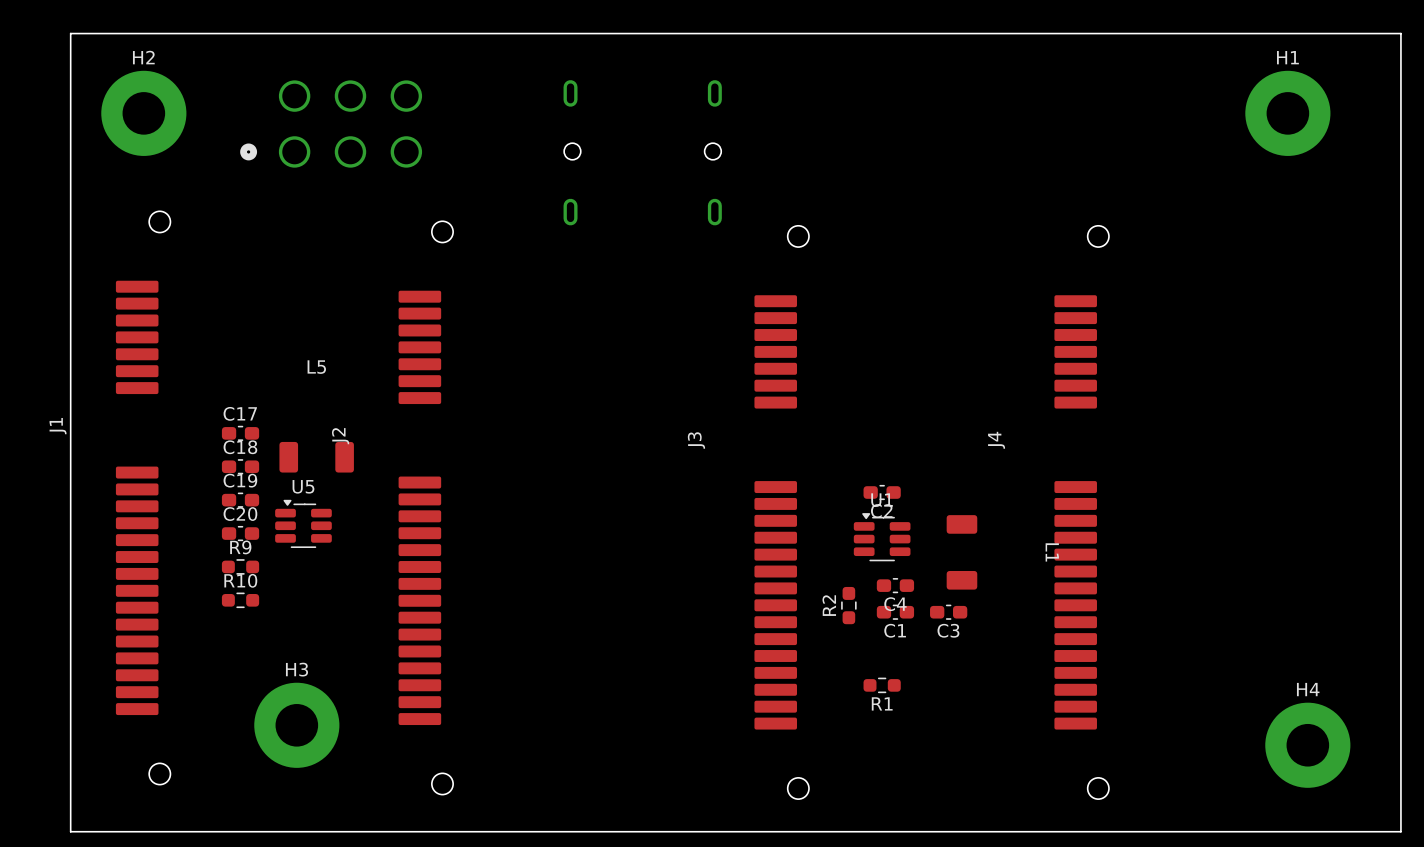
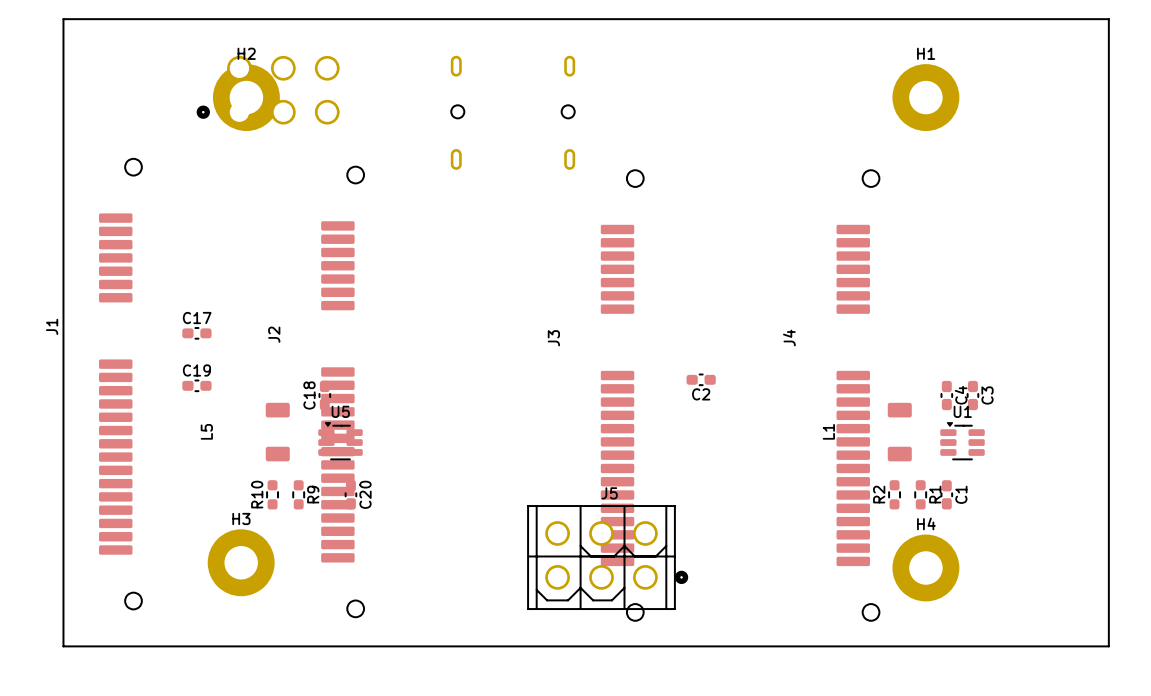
H2 position: (143, 113) -> (246, 97)
H1 position: (1287, 113) -> (925, 97)
L5 name position: L5 (316, 367) -> L5 (206, 431)
C18 name position: C18 (240, 447) -> C18 (309, 395)
L5 rotation: 0° (316, 457) -> 90° clockwise (277, 432)
L5 position: (316, 457) -> (277, 432)
C18 rotation: 0° (240, 466) -> 90° clockwise (324, 395)
C18 position: (240, 466) -> (324, 395)
U5 position: (303, 523) -> (340, 441)
C20 rotation: 0° (240, 533) -> 90° clockwise (350, 494)
C20 position: (240, 533) -> (350, 494)
U1 position: (882, 537) -> (962, 441)
L1 position: (961, 552) -> (899, 432)
L1 name rotation: 0° (1052, 552) -> 180° (828, 431)
R9 rotation: 0° (240, 566) -> 90° clockwise (298, 494)
R9 position: (240, 566) -> (298, 494)
R10 name position: R10 (240, 580) -> R10 (257, 494)
C4 rotation: 0° (895, 585) -> 90° clockwise (946, 395)
C4 position: (895, 585) -> (946, 395)
R10 rotation: 0° (240, 600) -> 90° clockwise (272, 494)
R10 position: (240, 600) -> (272, 494)
C4 name position: C4 (895, 604) -> C4 (961, 395)
R2 position: (848, 605) -> (894, 494)
C1 rotation: 0° (895, 612) -> 90° clockwise (946, 494)
C1 position: (895, 612) -> (946, 494)
C3 rotation: 0° (948, 612) -> 90° clockwise (972, 395)
C3 position: (948, 612) -> (972, 395)
C1 name position: C1 (895, 630) -> C1 (961, 494)
C3 name position: C3 (948, 630) -> C3 (987, 395)
R1 rotation: 0° (882, 685) -> 90° clockwise (920, 494)
R1 position: (882, 685) -> (920, 494)
R1 name position: R1 (882, 703) -> R1 (935, 494)
J5: none -> (607, 557)
H4 position: (1307, 745) -> (925, 567)

